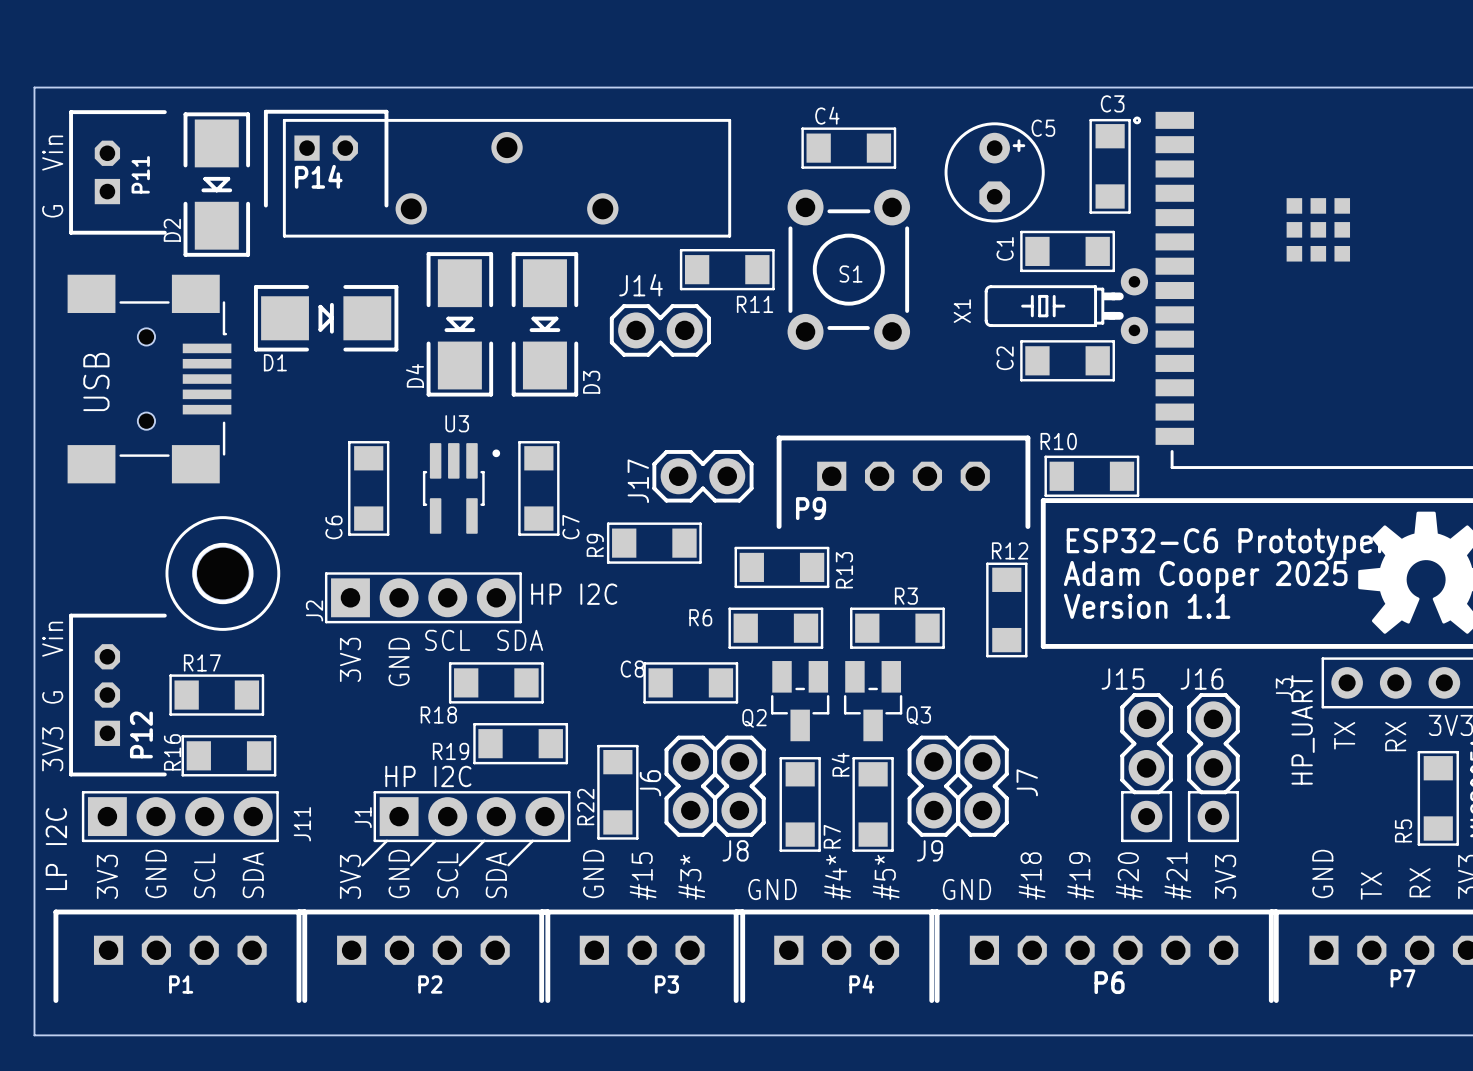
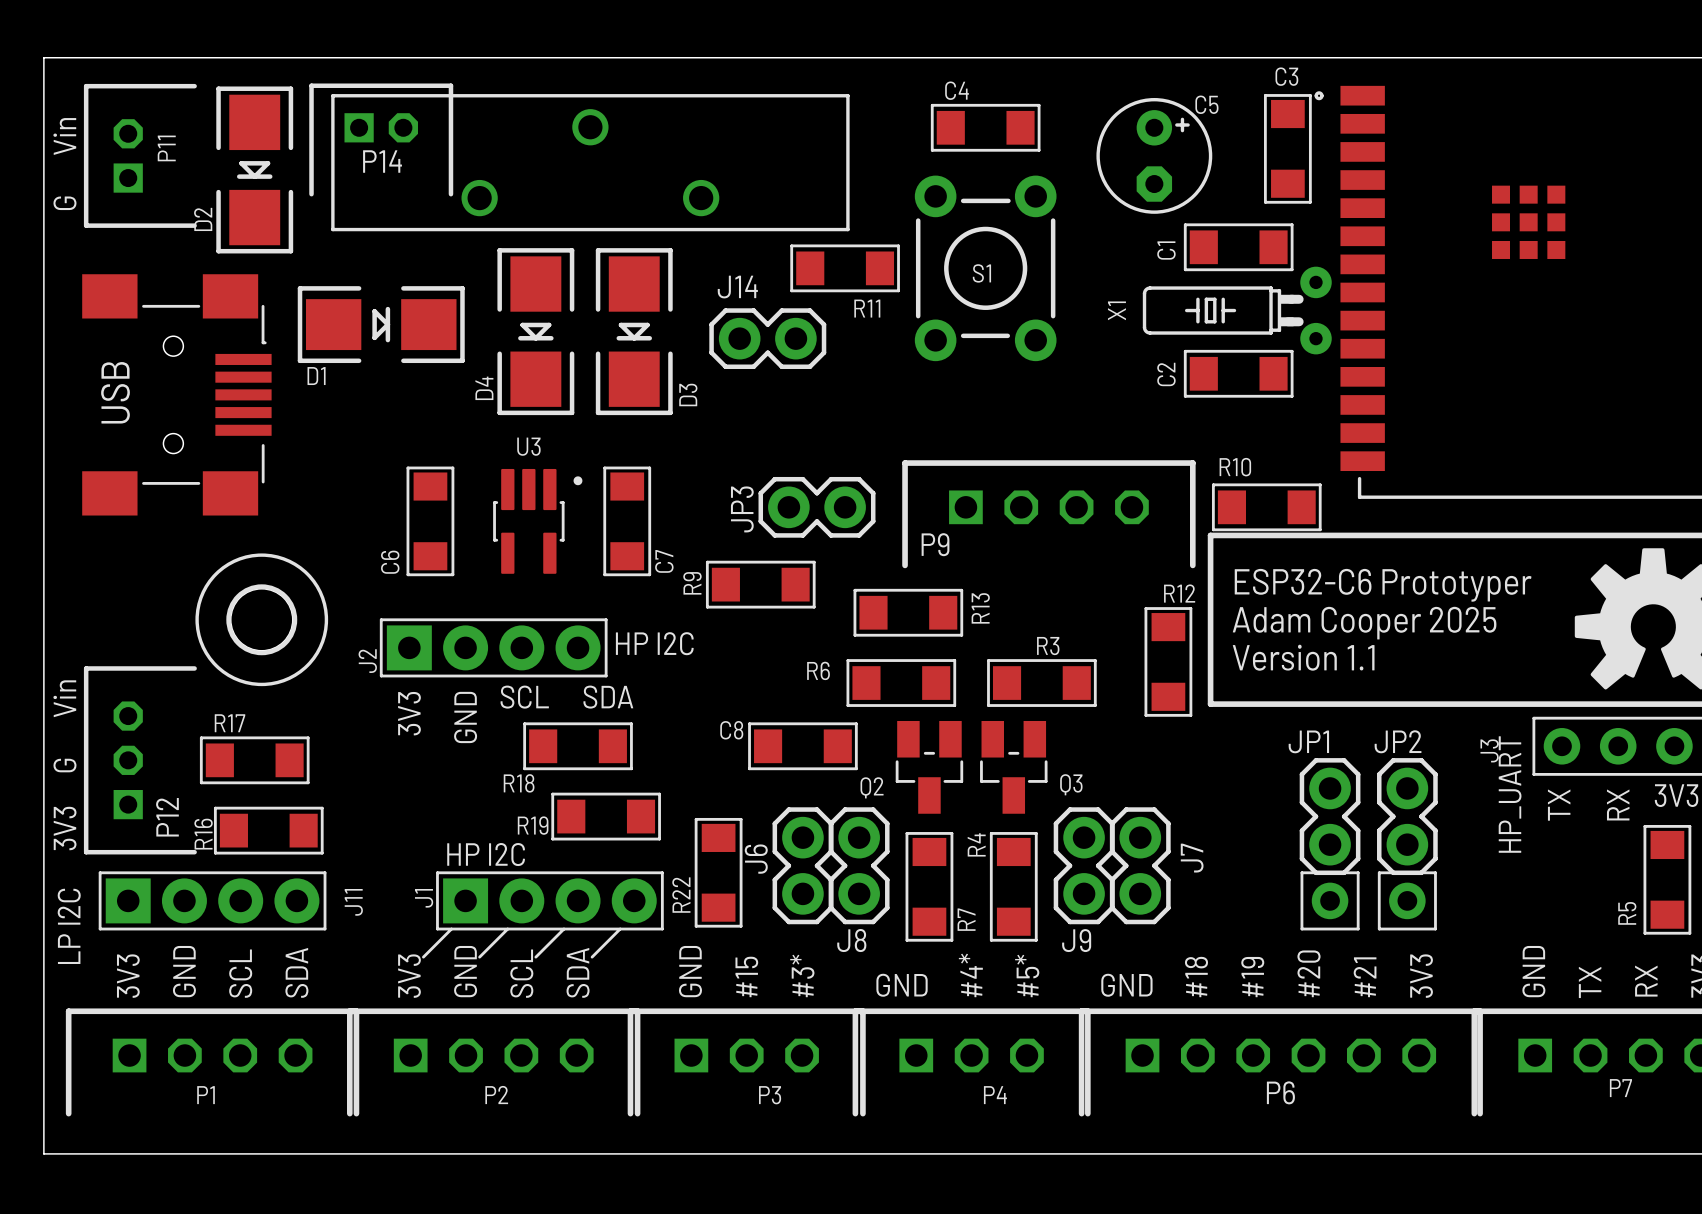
J17 name: J17 (638, 481) -> JP3 (742, 509)
J15 name: J15 (1123, 679) -> JP1 (1308, 741)
J16 name: J16 (1202, 679) -> JP2 (1398, 741)

